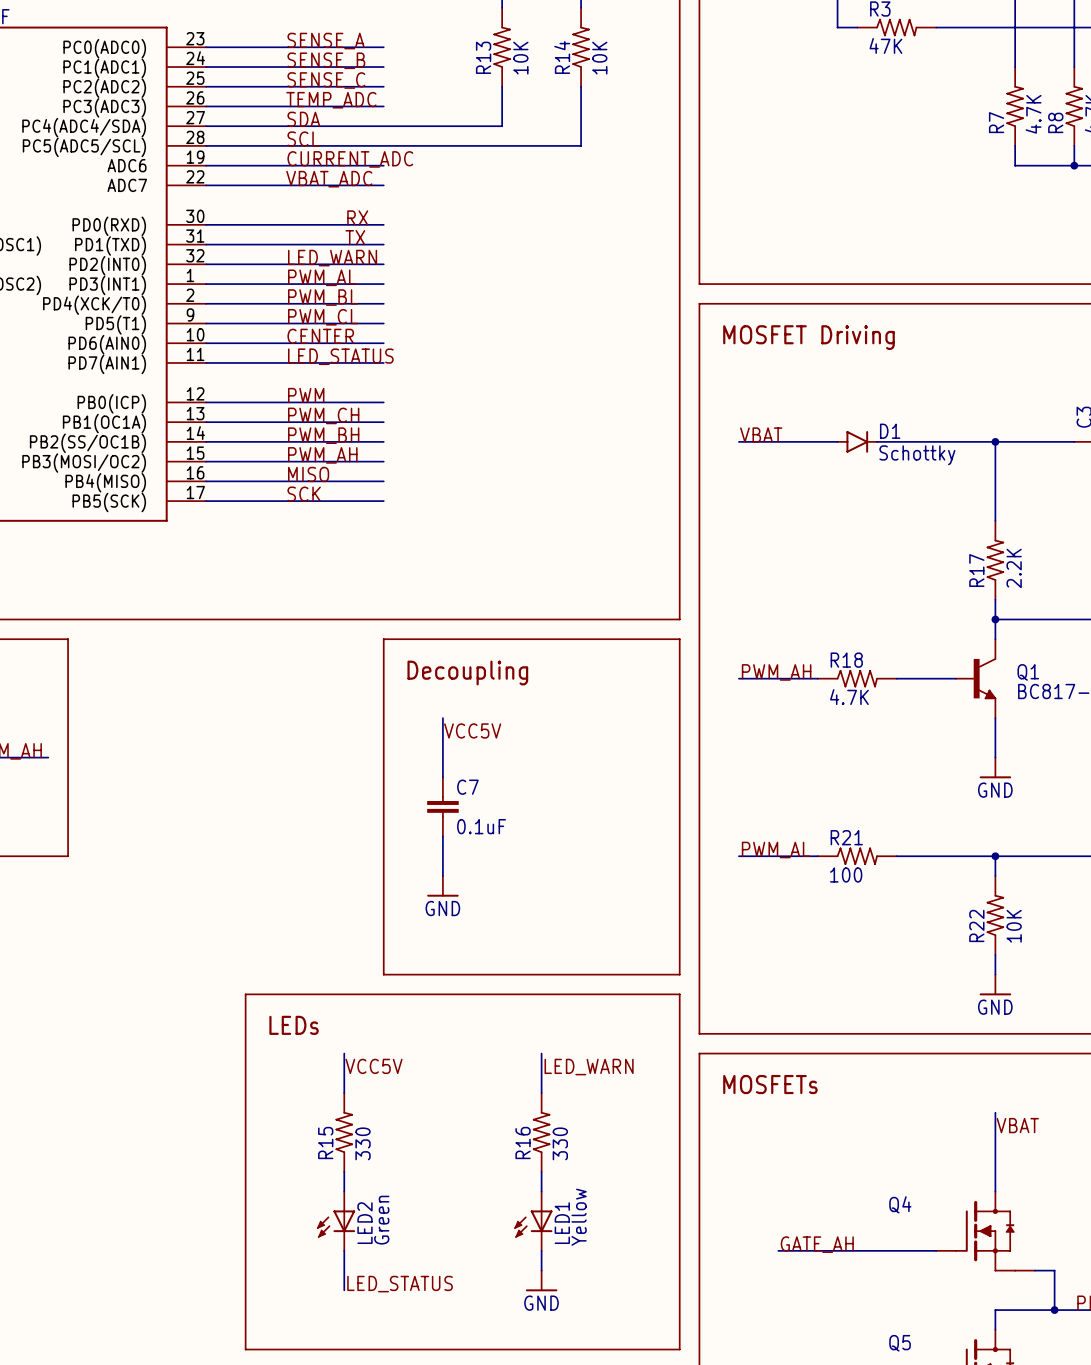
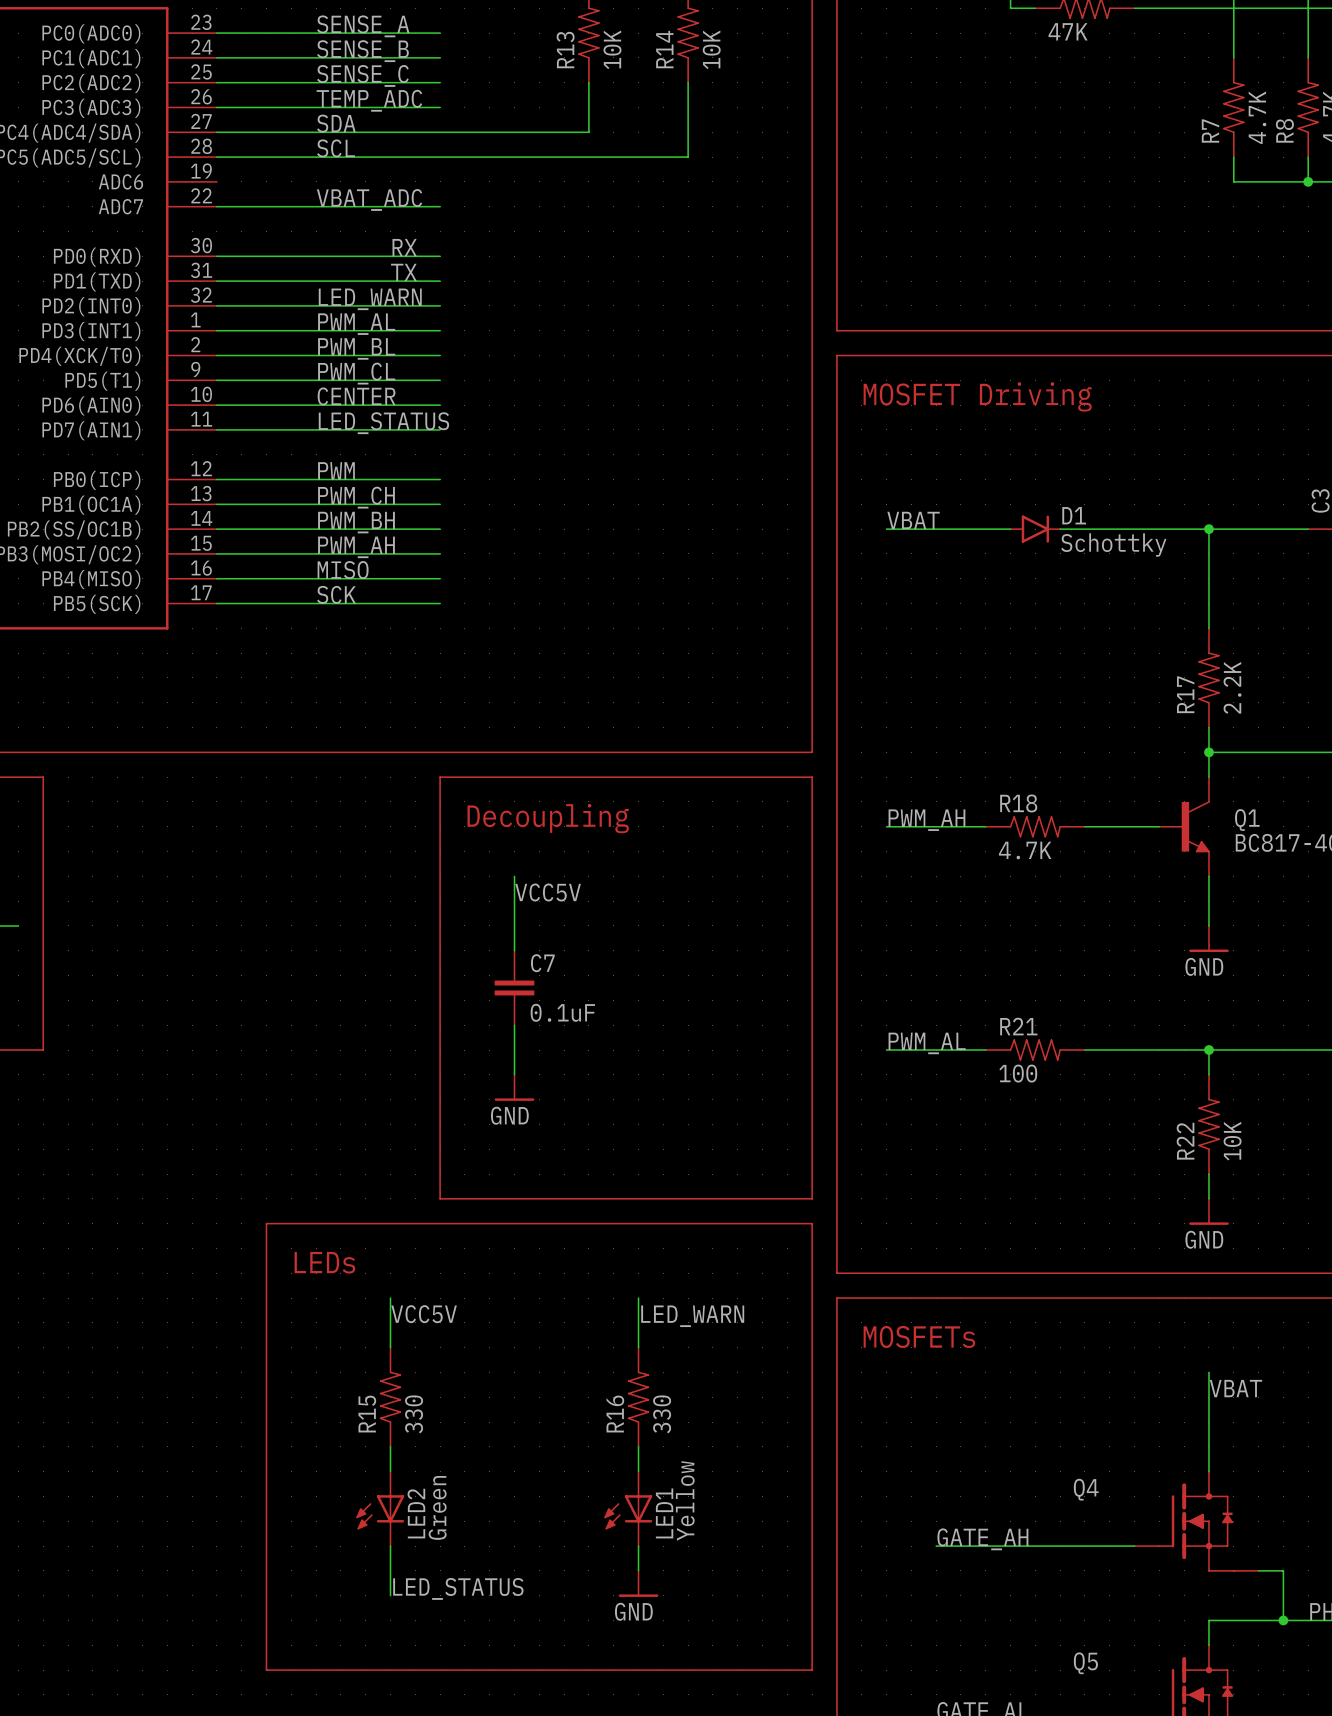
label: CURRENT_ADC (350, 159) -> none
wire: (206, 165) (383, 165) -> none

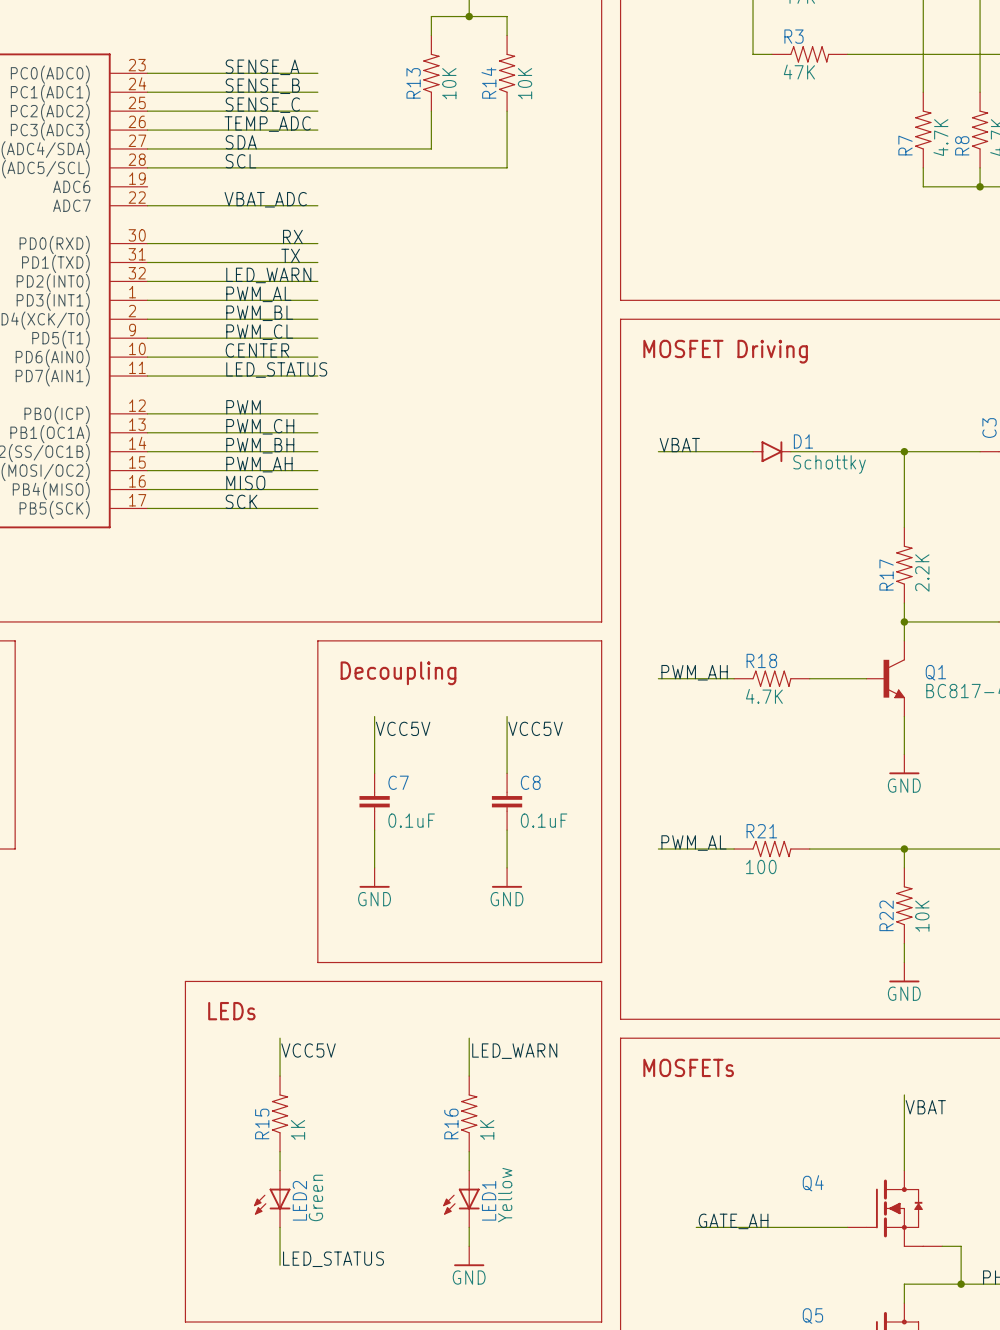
wire: none -> (507, 716) (507, 773)
label: none -> VCC5V (535, 728)
C8: none -> 0.1uF (507, 801)
wire: none -> (507, 830) (507, 867)
power symbol: none -> GND (507, 877)
R15 value: 330 (414, 1414) -> 1K (297, 1129)
R16 value: 330 (662, 1414) -> 1K (487, 1129)

